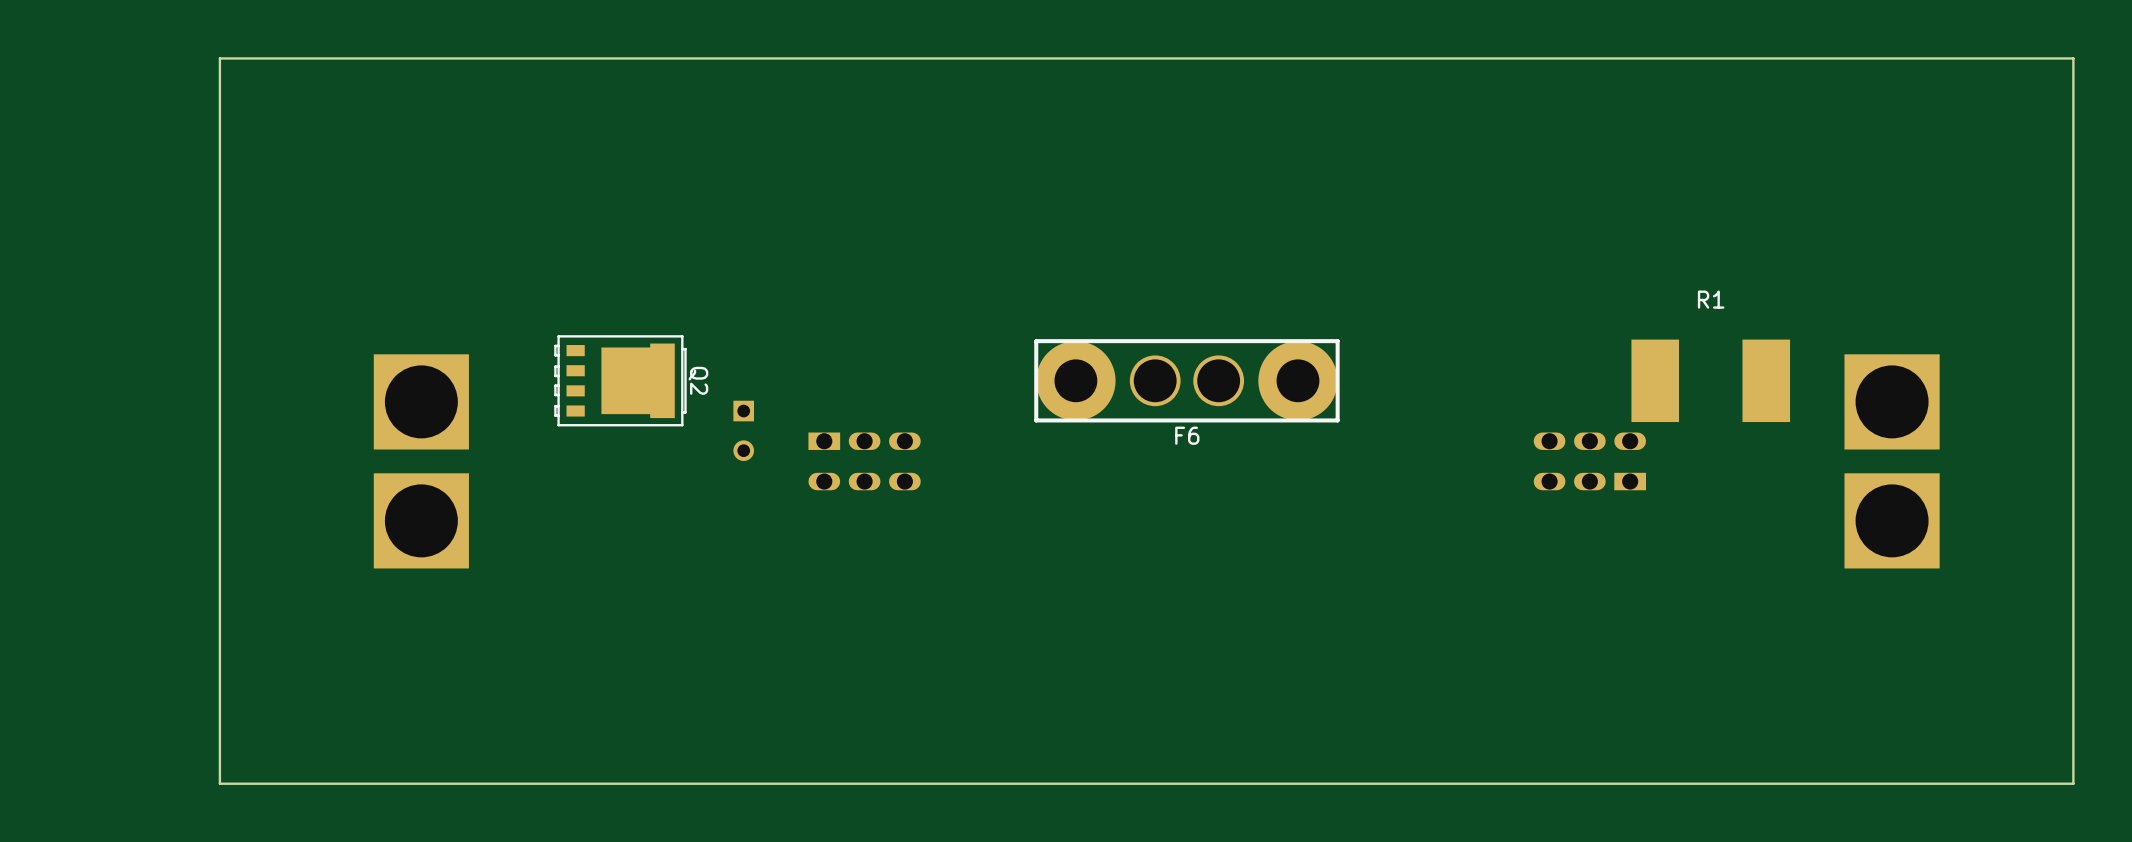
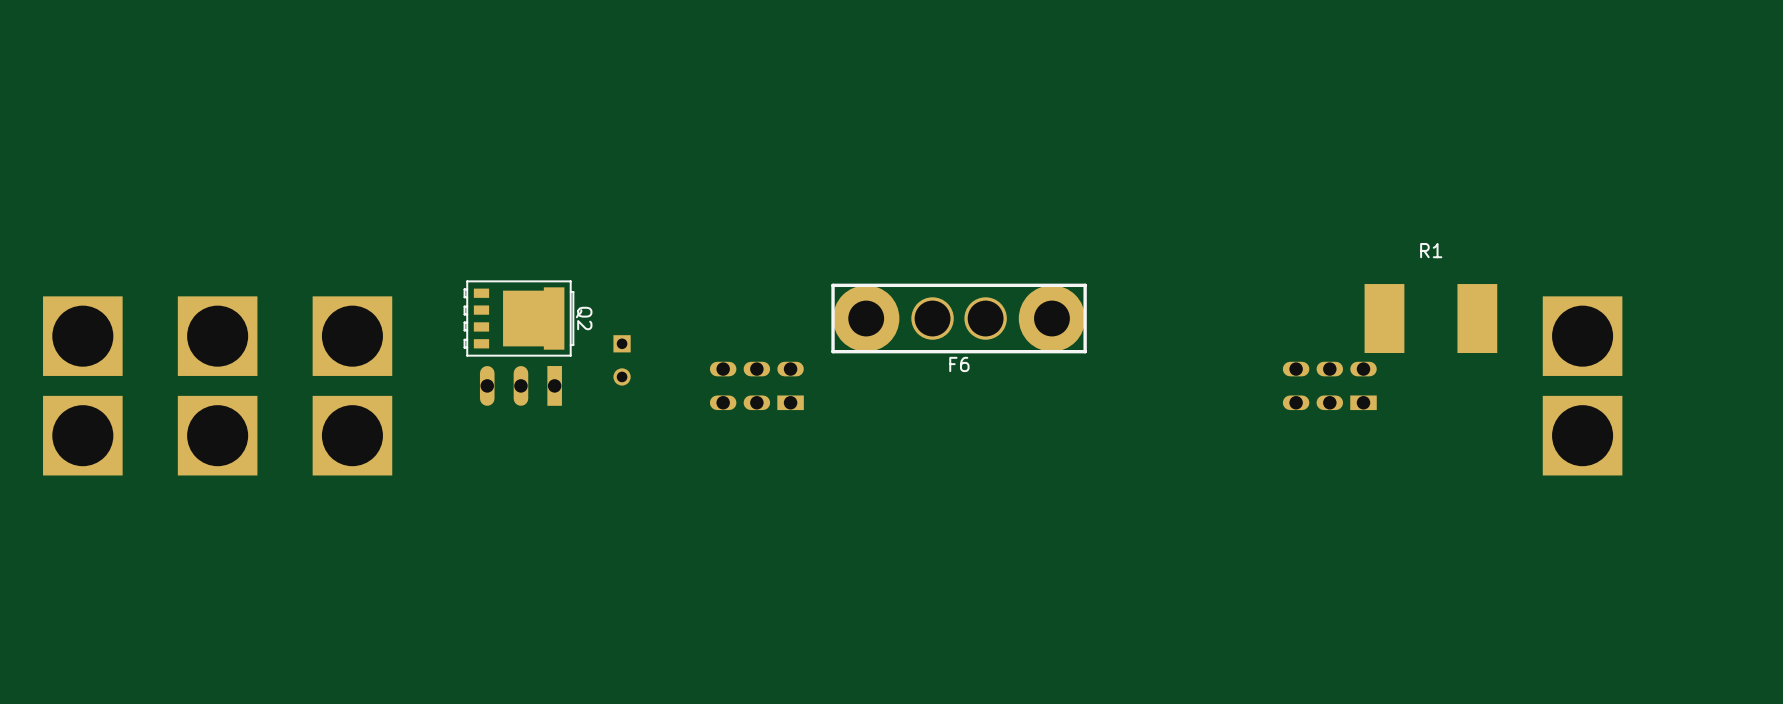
board edge: (2073, 58) (2073, 783) (219, 783) (219, 58) (2073, 58) -> none
F6 position: (1186, 380) -> (959, 318)
part: none -> (82, 385)
part: none -> (217, 385)
part: none -> (520, 385)
part rotation: 0° (864, 461) -> 180° (756, 385)

